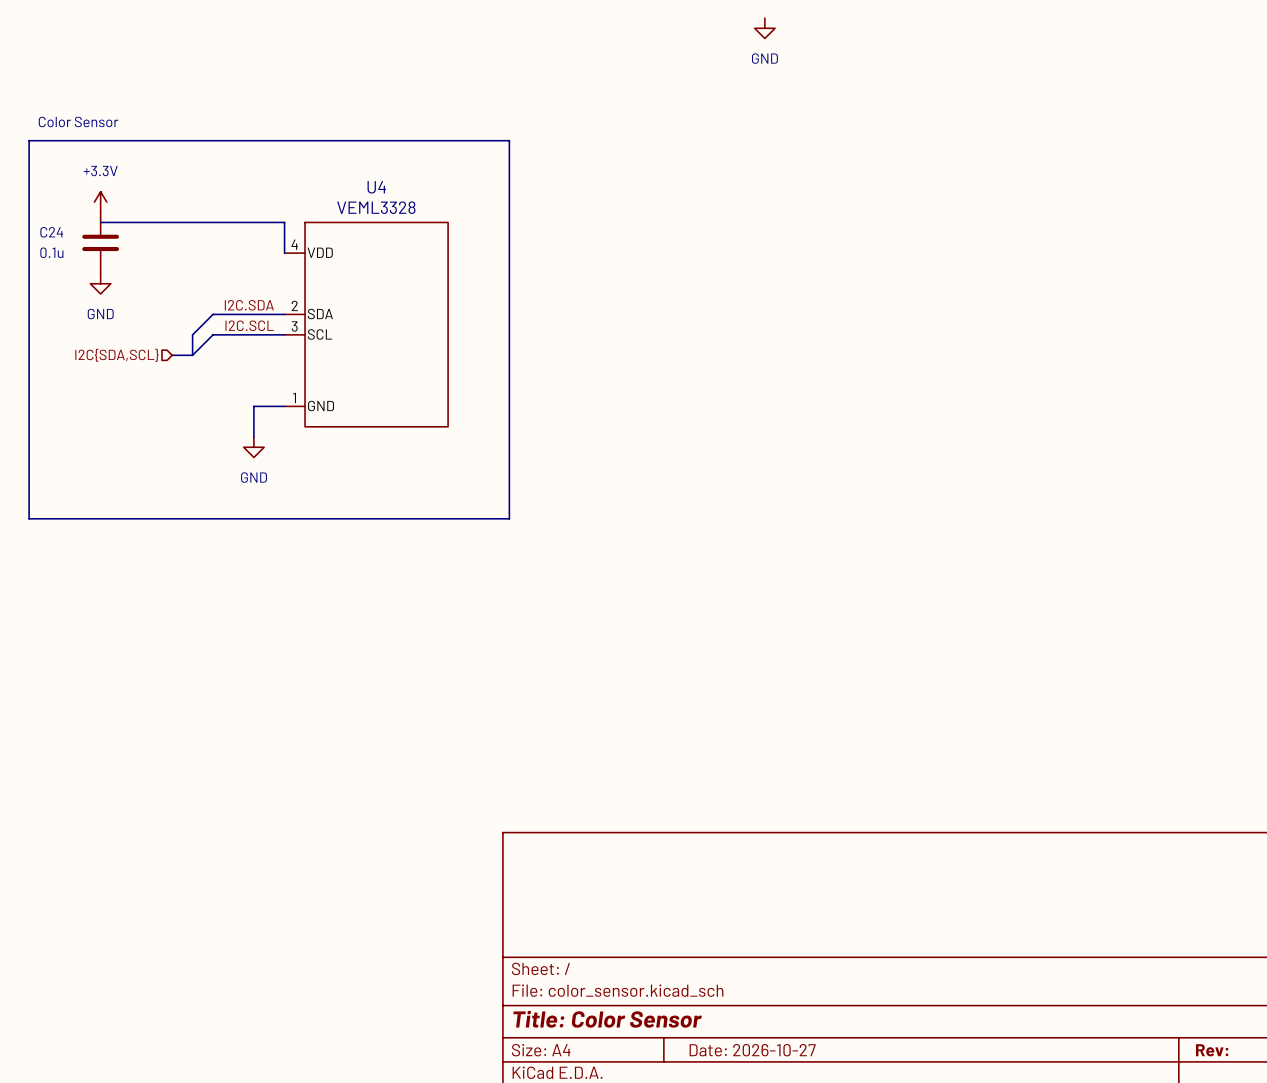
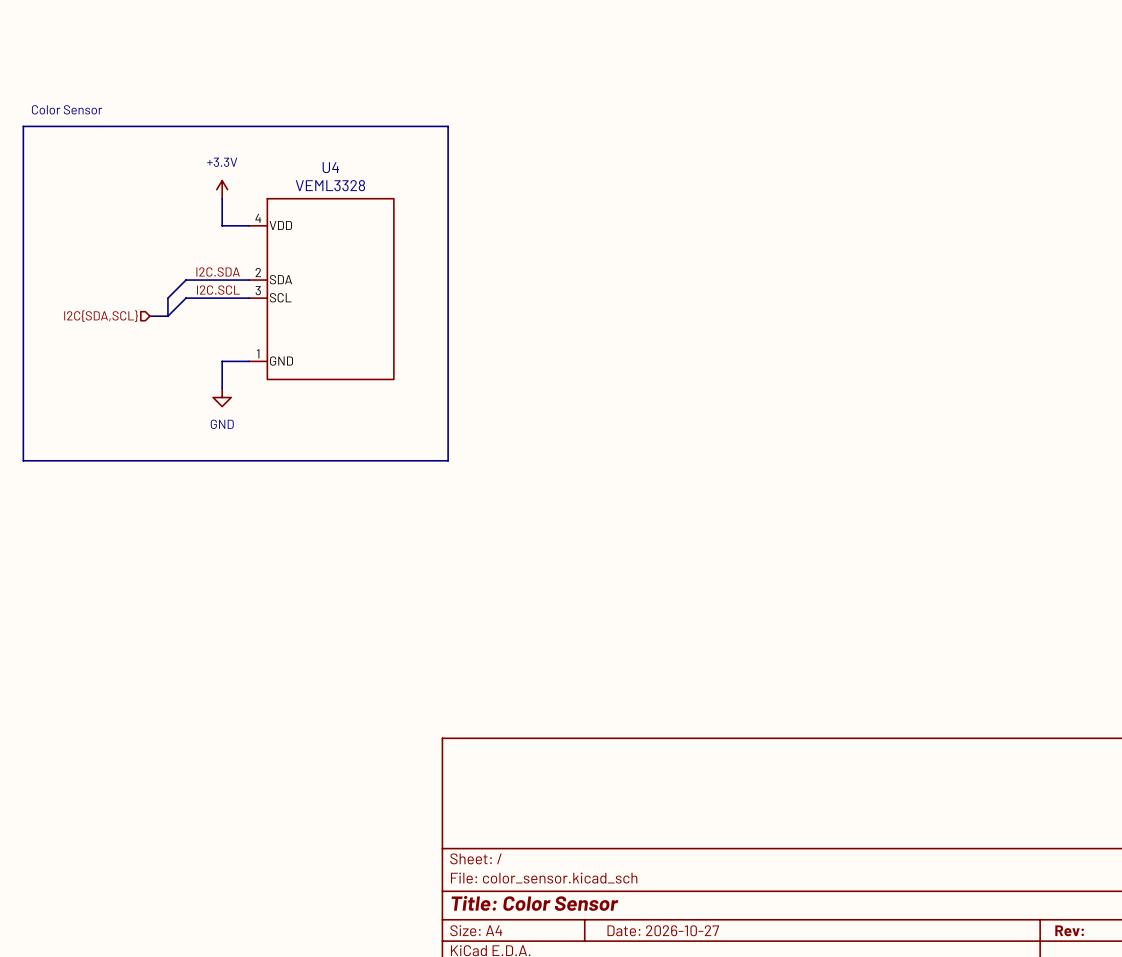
power symbol: GND (764, 28) -> none
power symbol position: +3.3V (100, 202) -> +3.3V (222, 189)
wire: (100, 222) (284, 222) (284, 253) -> (222, 198) (222, 225) (249, 225)
C24: 0.1u (100, 242) -> none
power symbol: GND (100, 283) -> none

